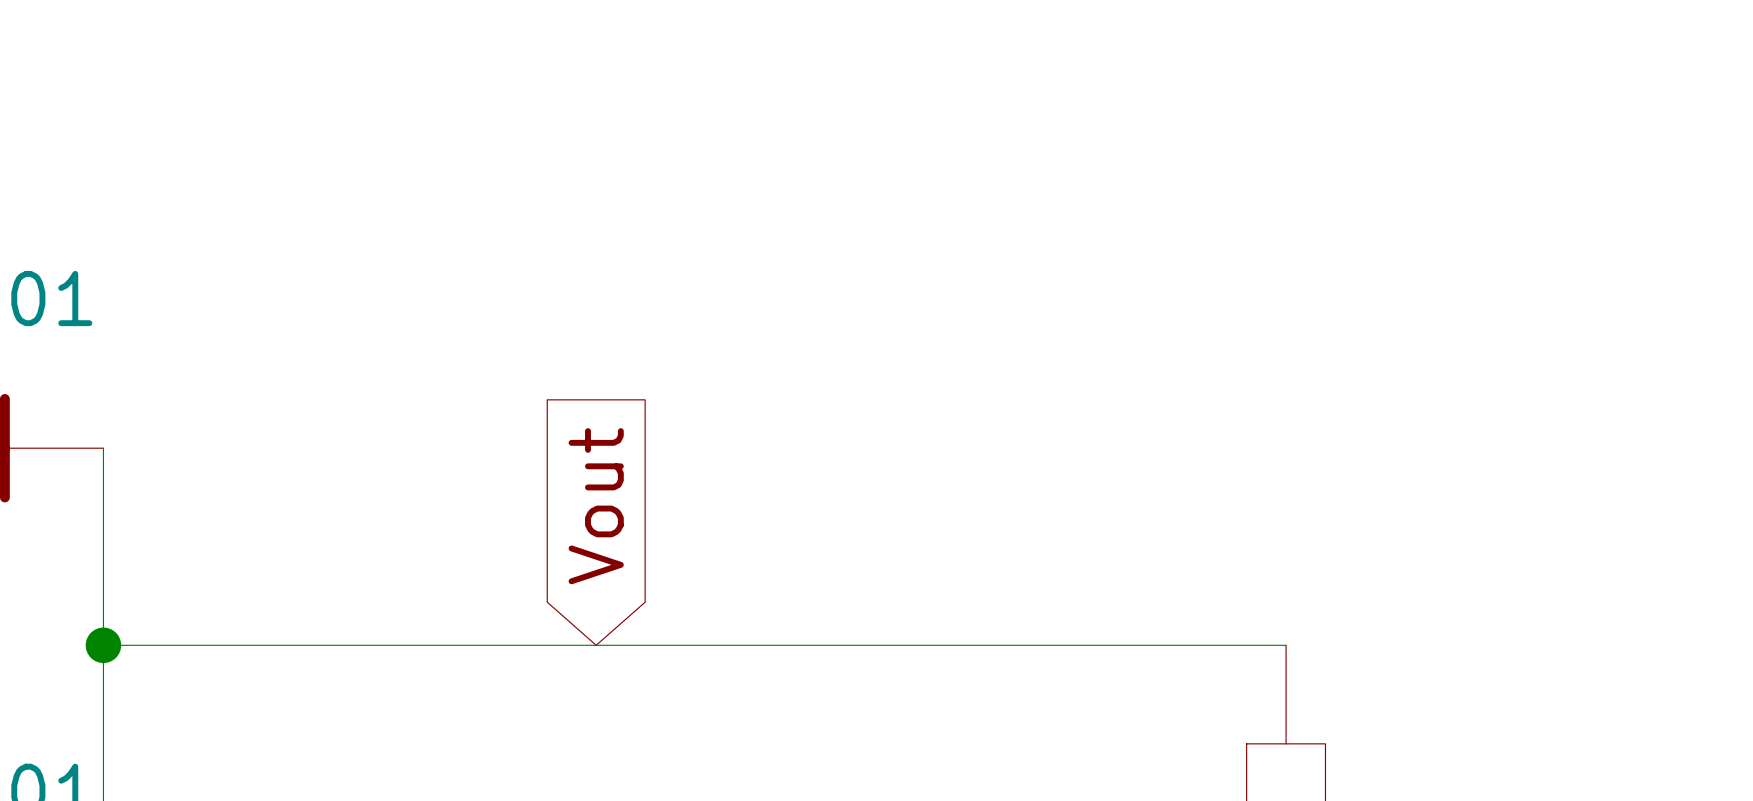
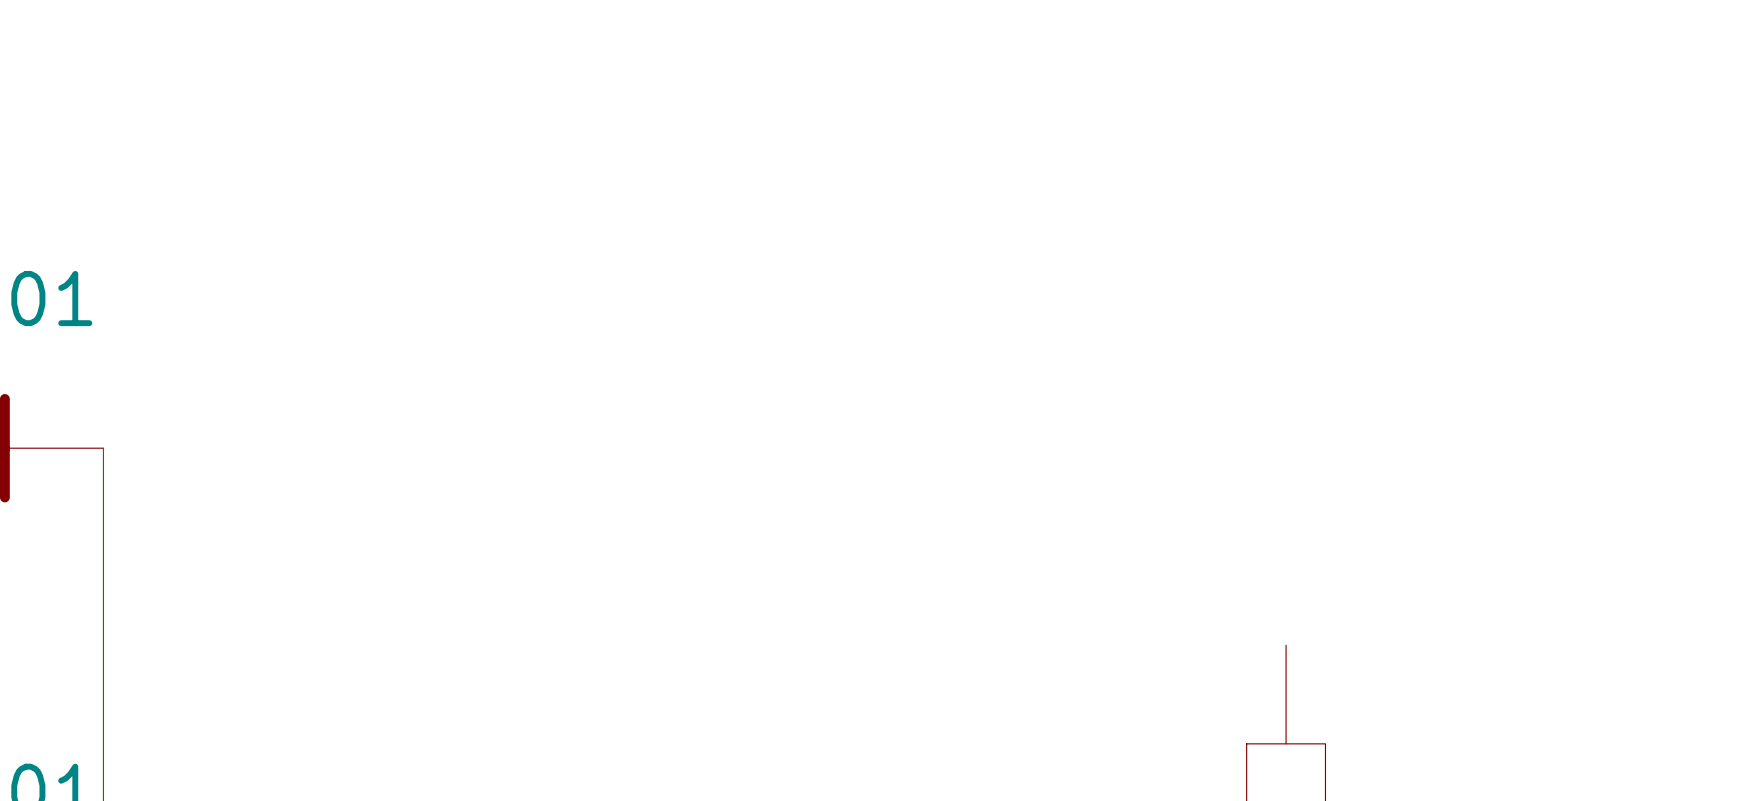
global label: Vout (596, 506) -> none
wire: (103, 645) (1286, 645) -> none
junction: (103, 645) -> none

